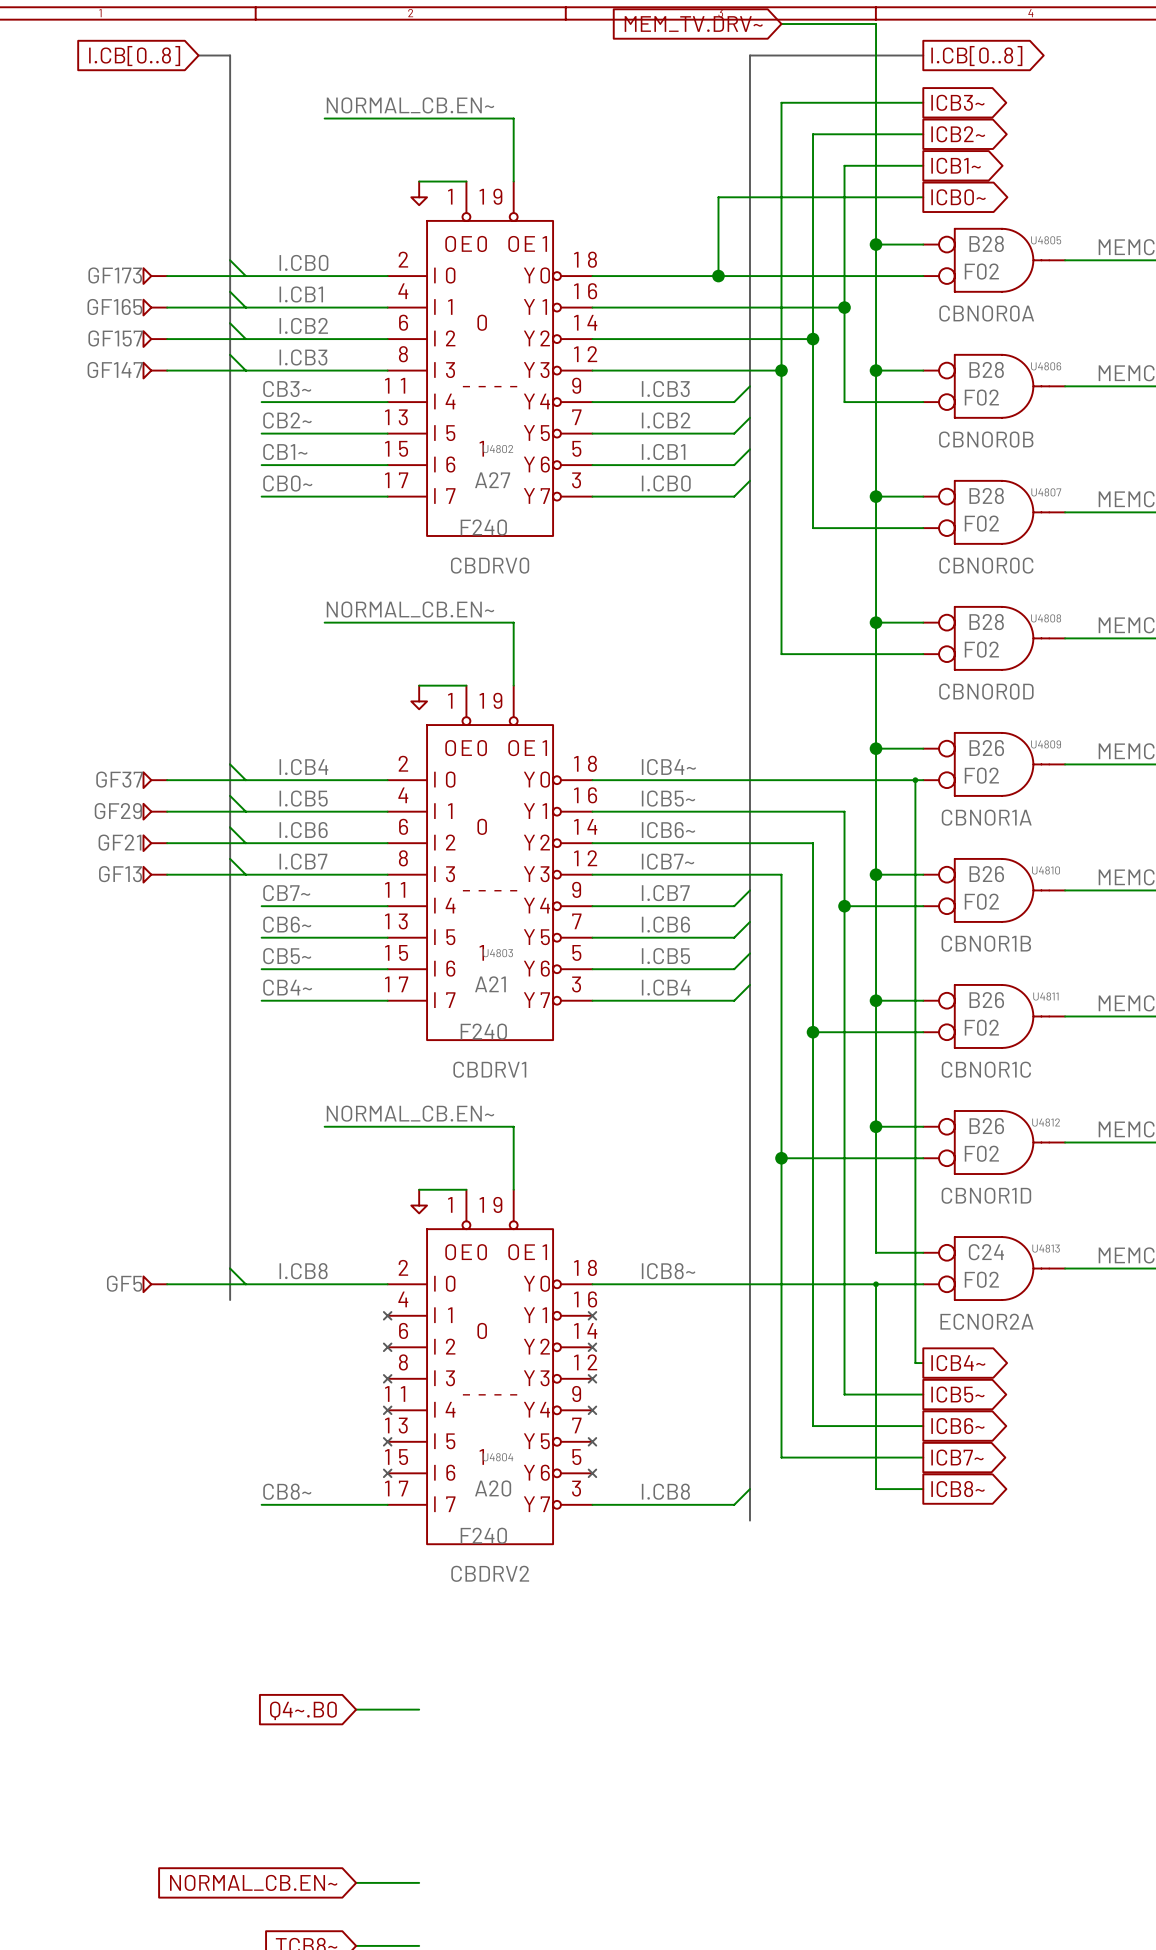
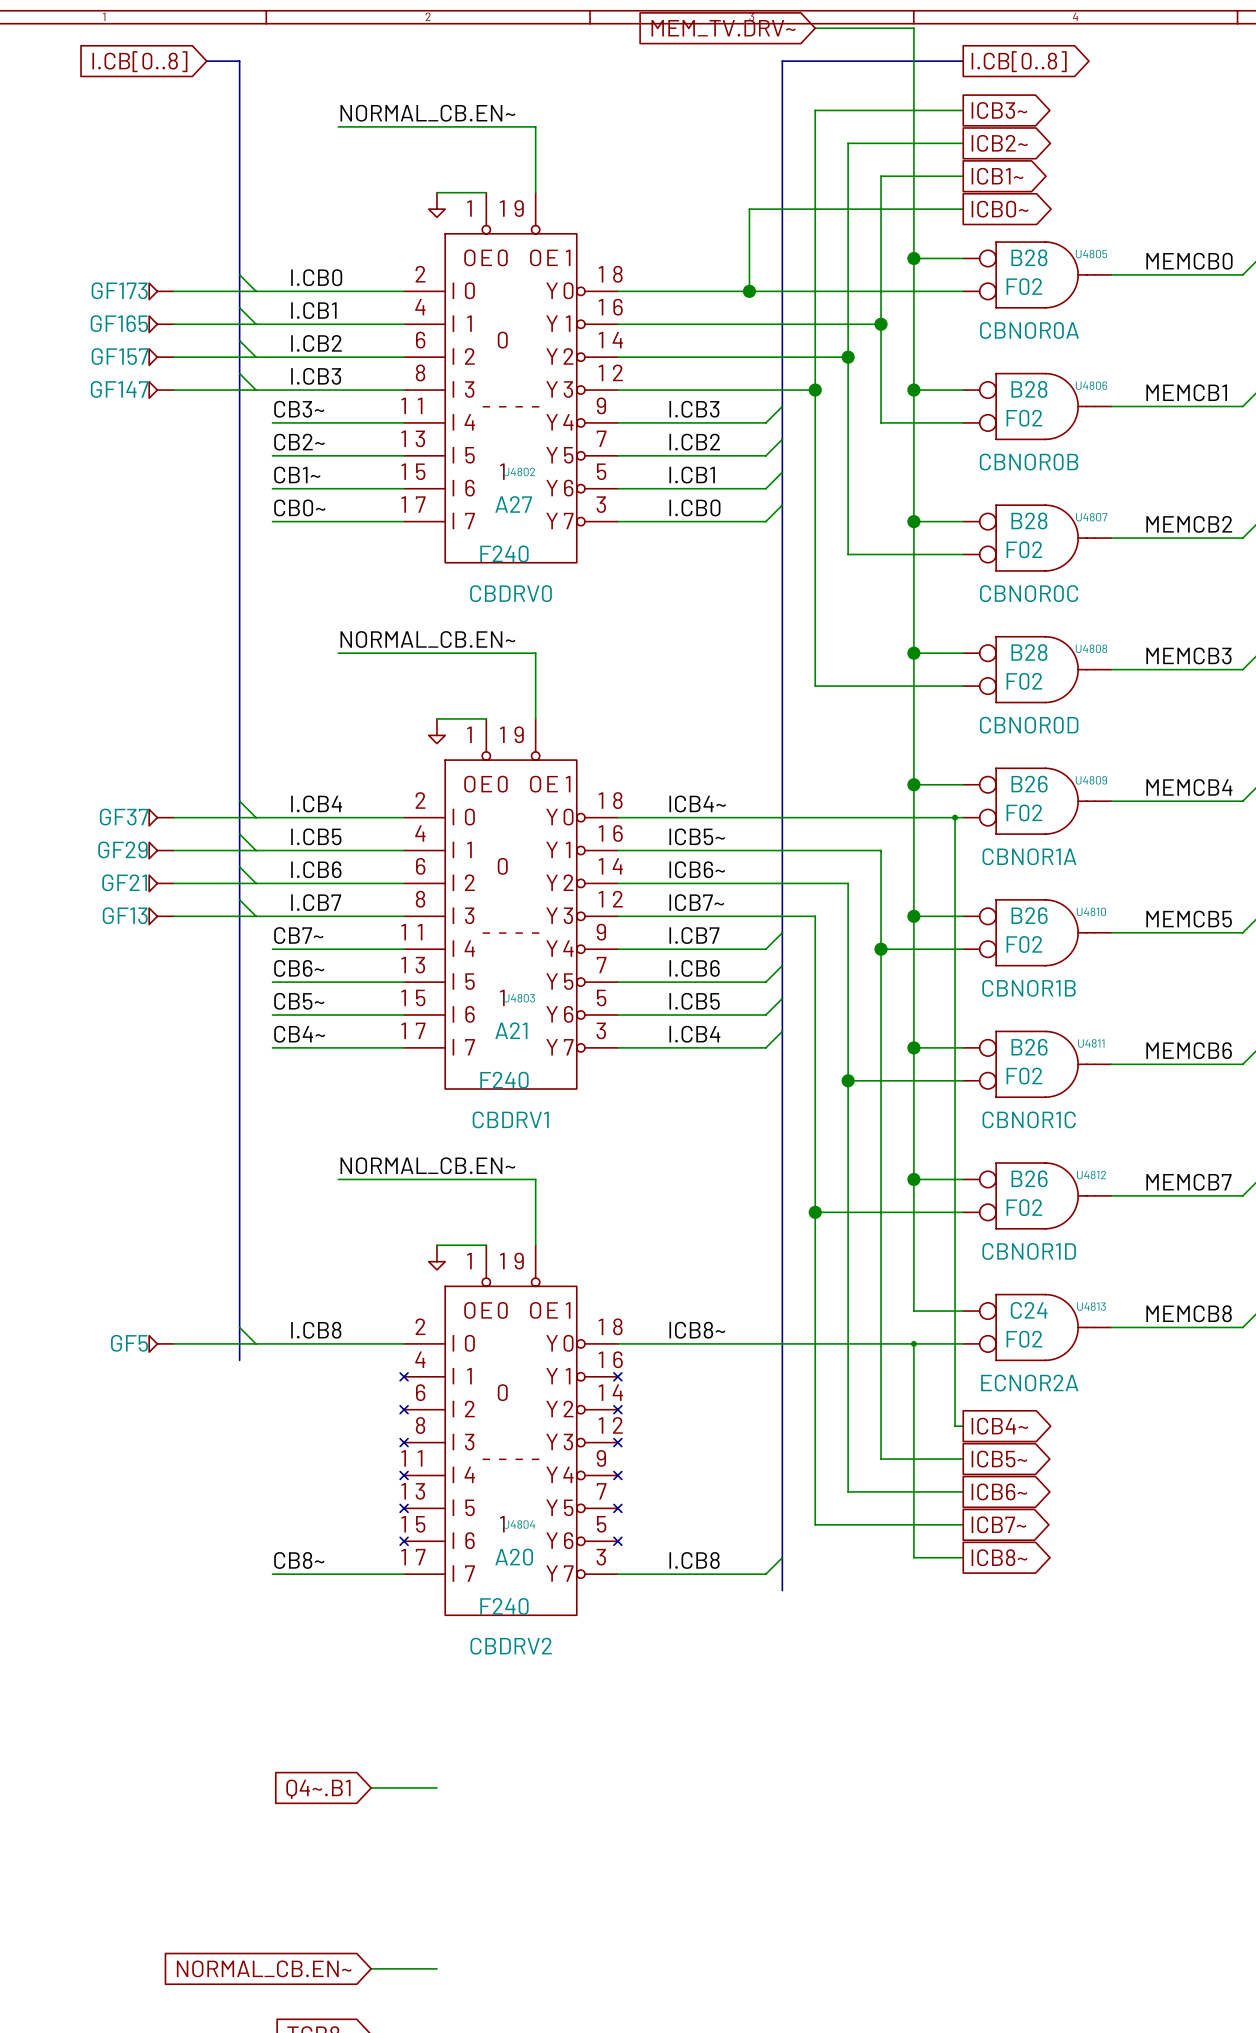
global label: Q4~.B0 (303, 1710) -> Q4~.B1 (318, 1789)

